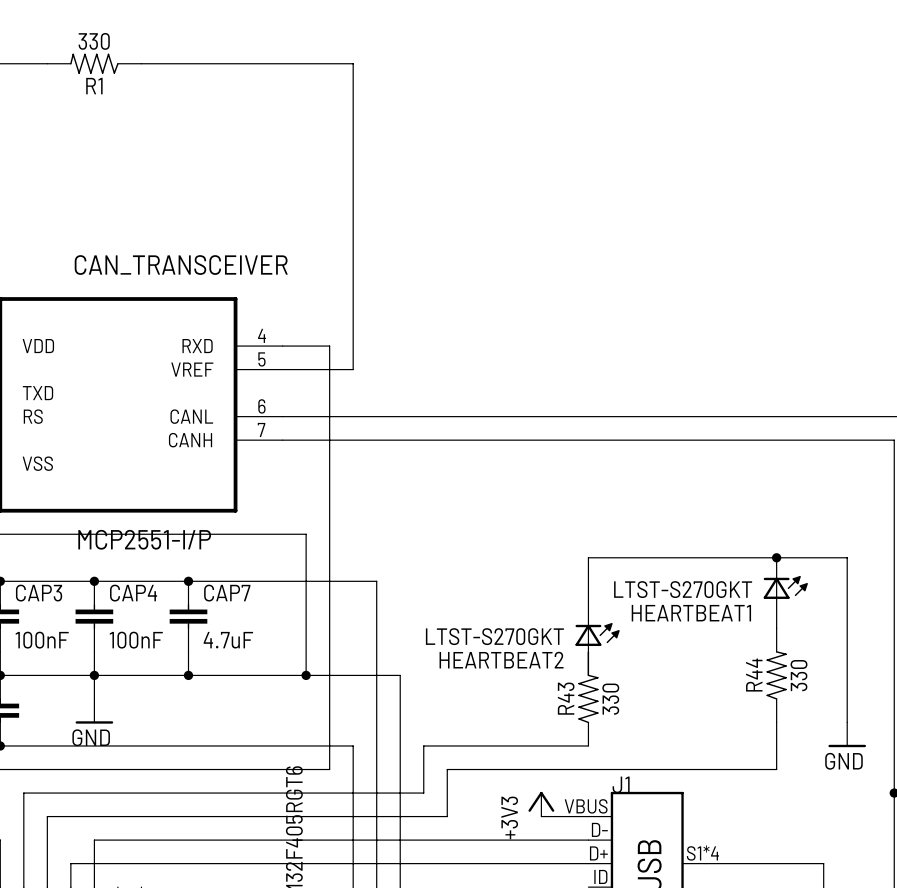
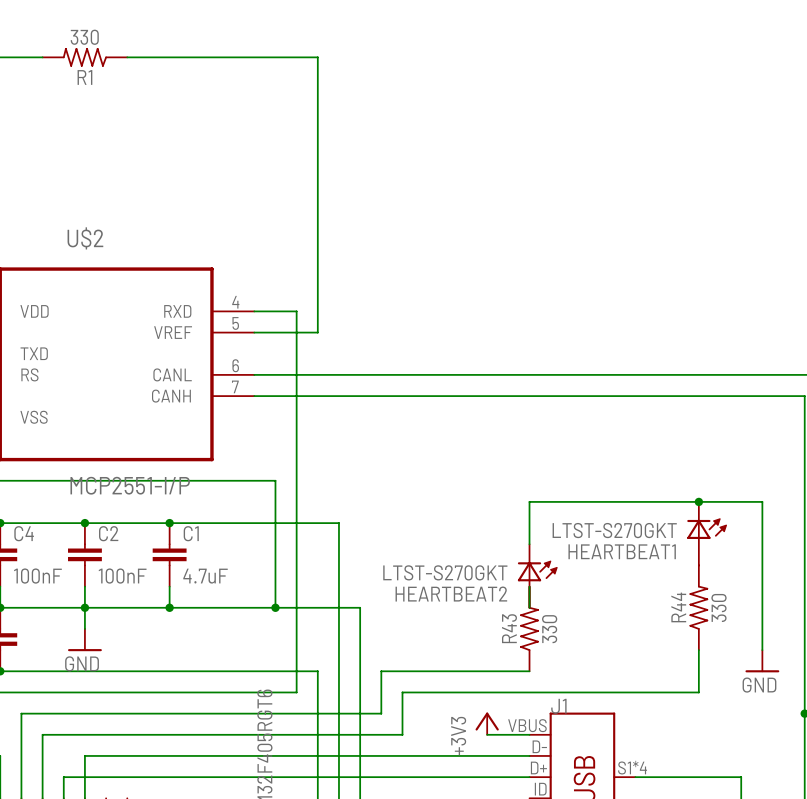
CAN_TRANSCEIVER name: CAN_TRANSCEIVER (181, 265) -> U$2 (85, 238)
CAP3 name: CAP3 (39, 593) -> C4 (24, 533)
CAP4 name: CAP4 (133, 593) -> C2 (108, 533)
CAP7 name: CAP7 (227, 593) -> C1 (191, 533)

